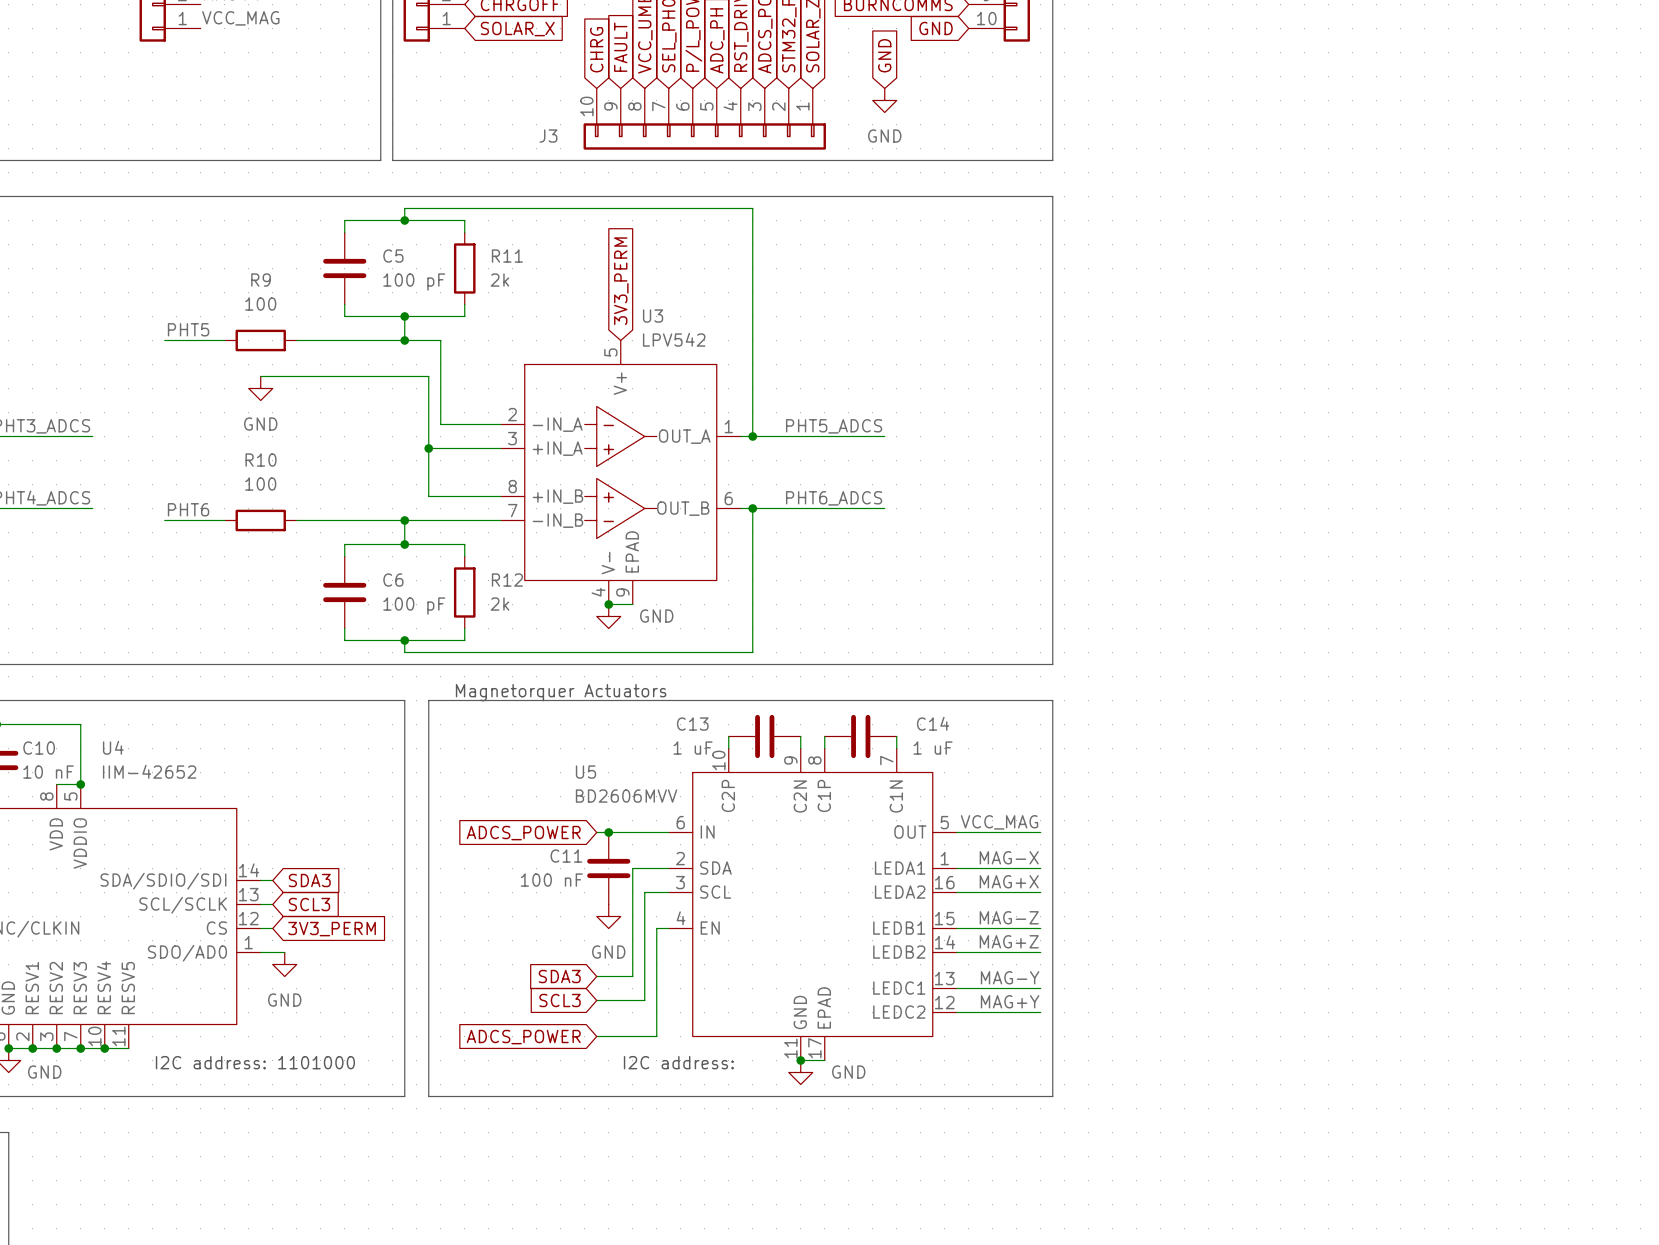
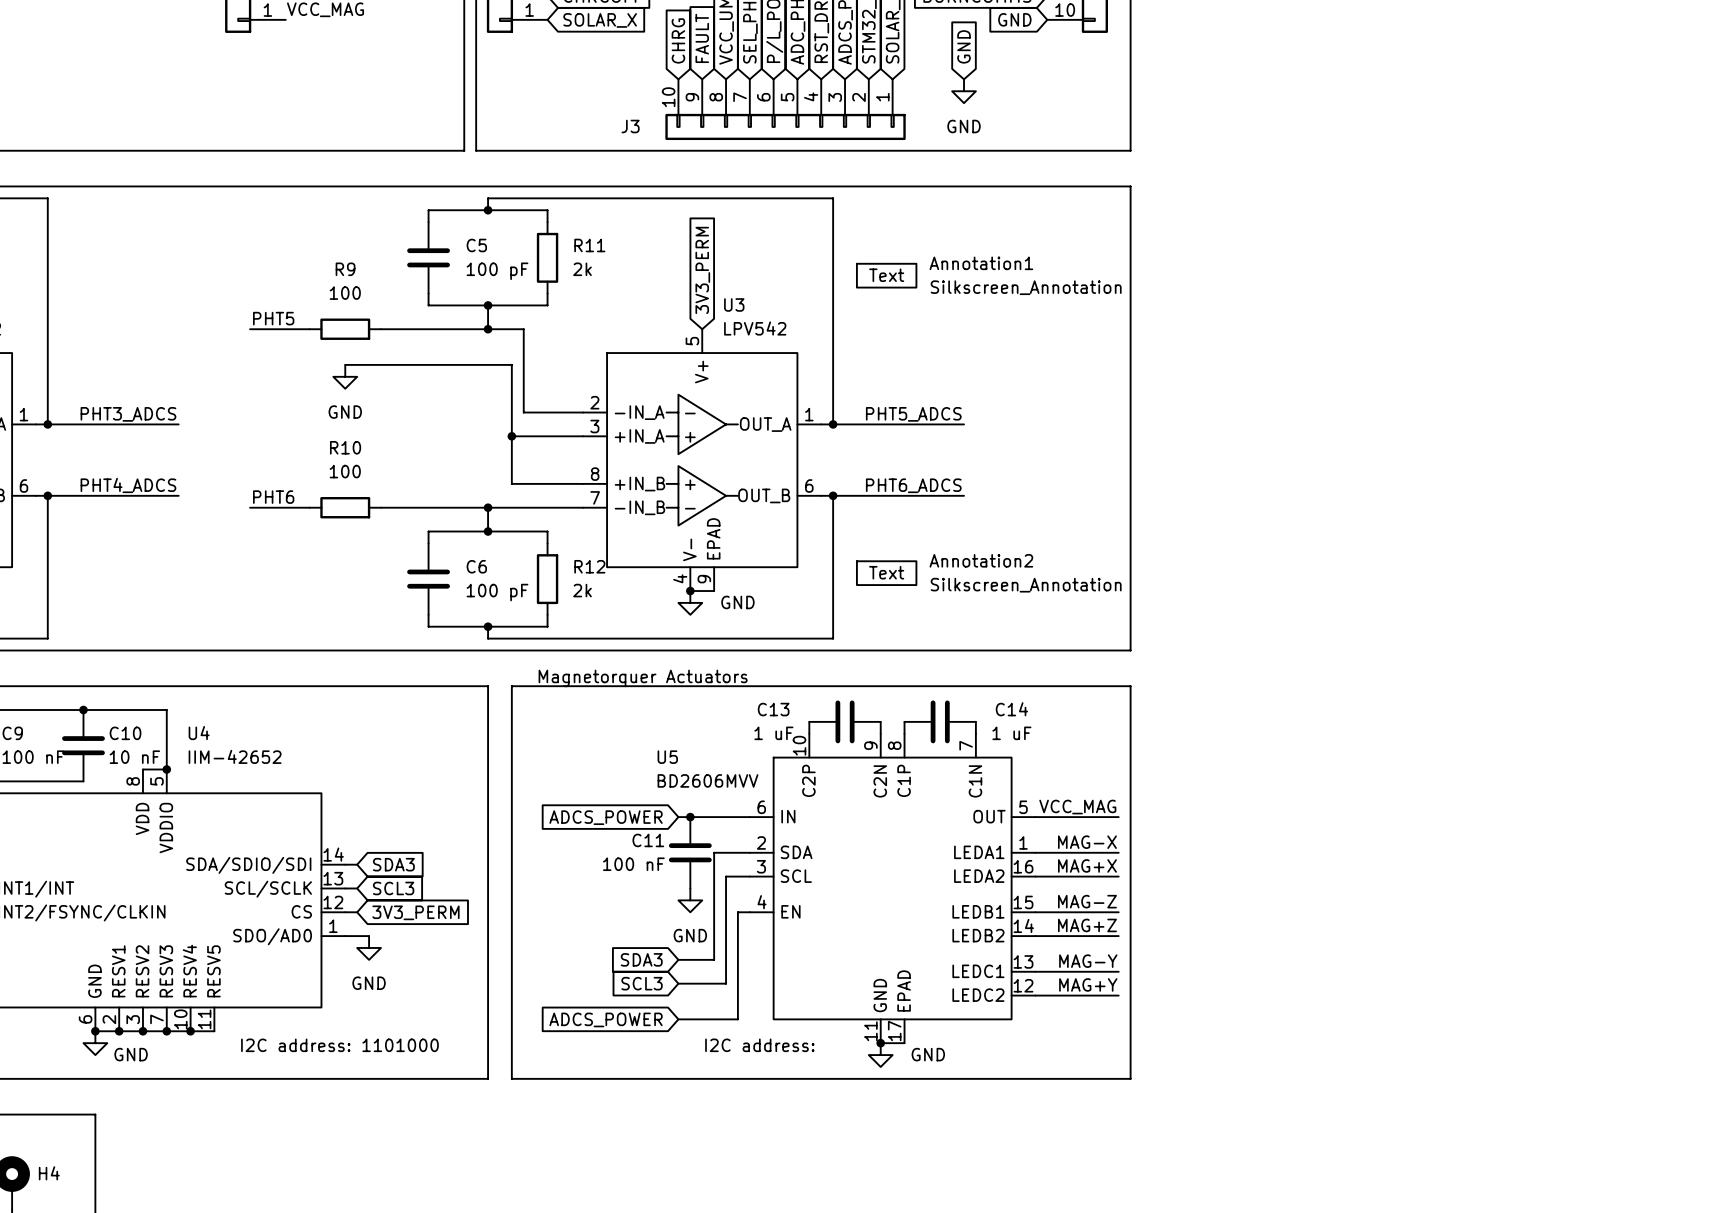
Annotation1: none -> Silkscreen_Annotation (886, 275)
Annotation2: none -> Silkscreen_Annotation (886, 573)

